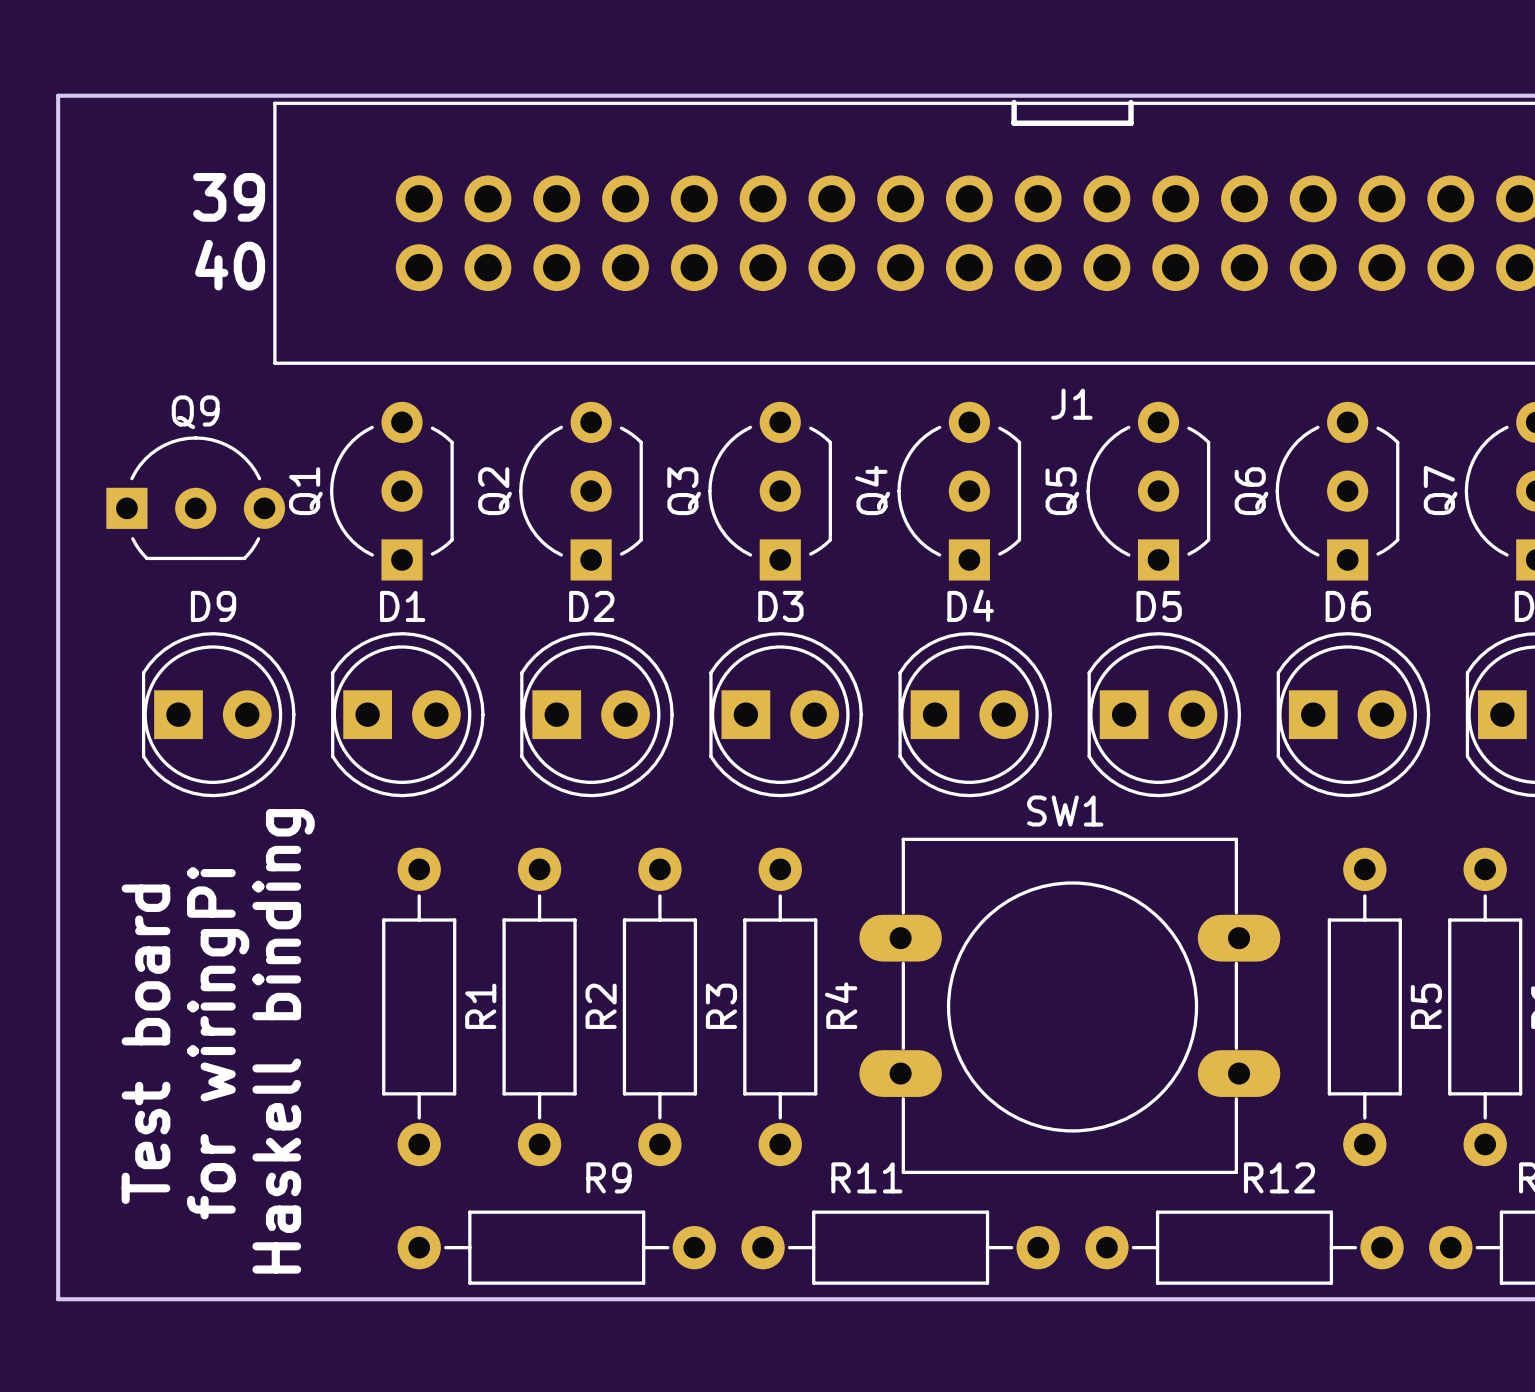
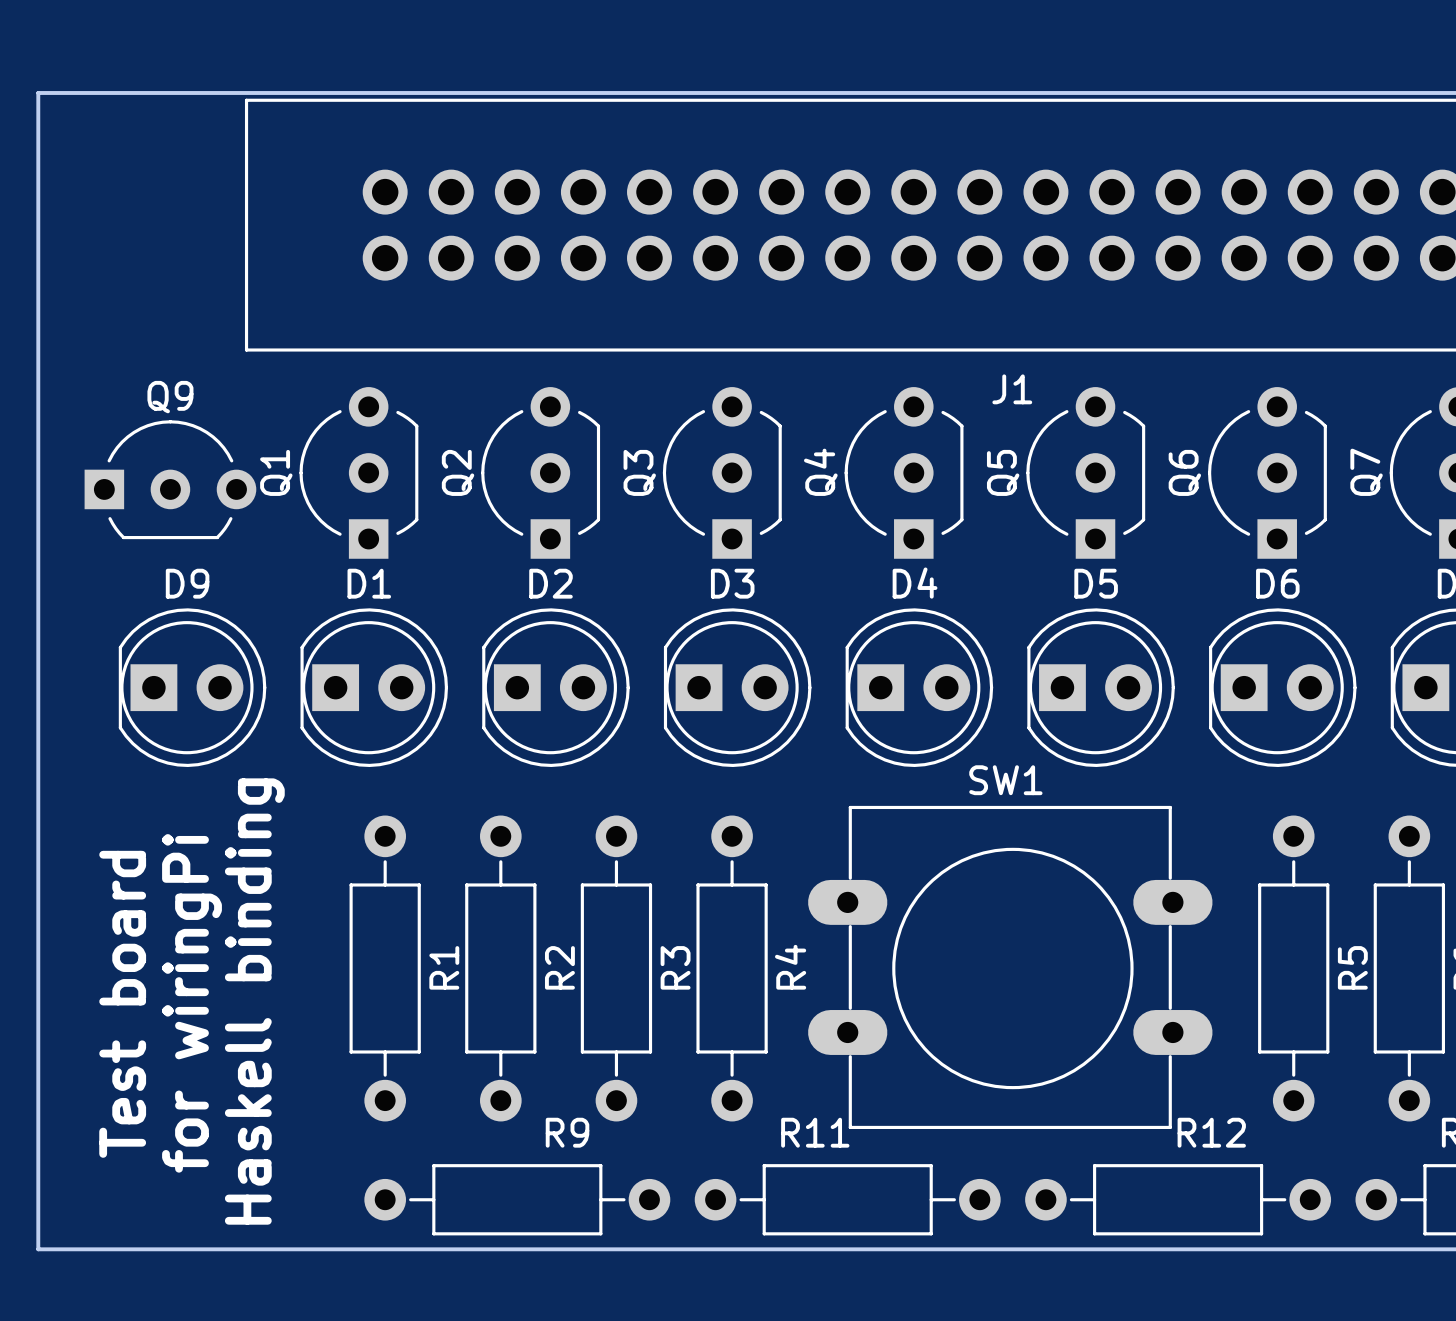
line: (1014, 102) (1014, 123) (1131, 123) (1131, 102) -> none
text: 39 (229, 197) -> none
text: 40 (230, 265) -> none

